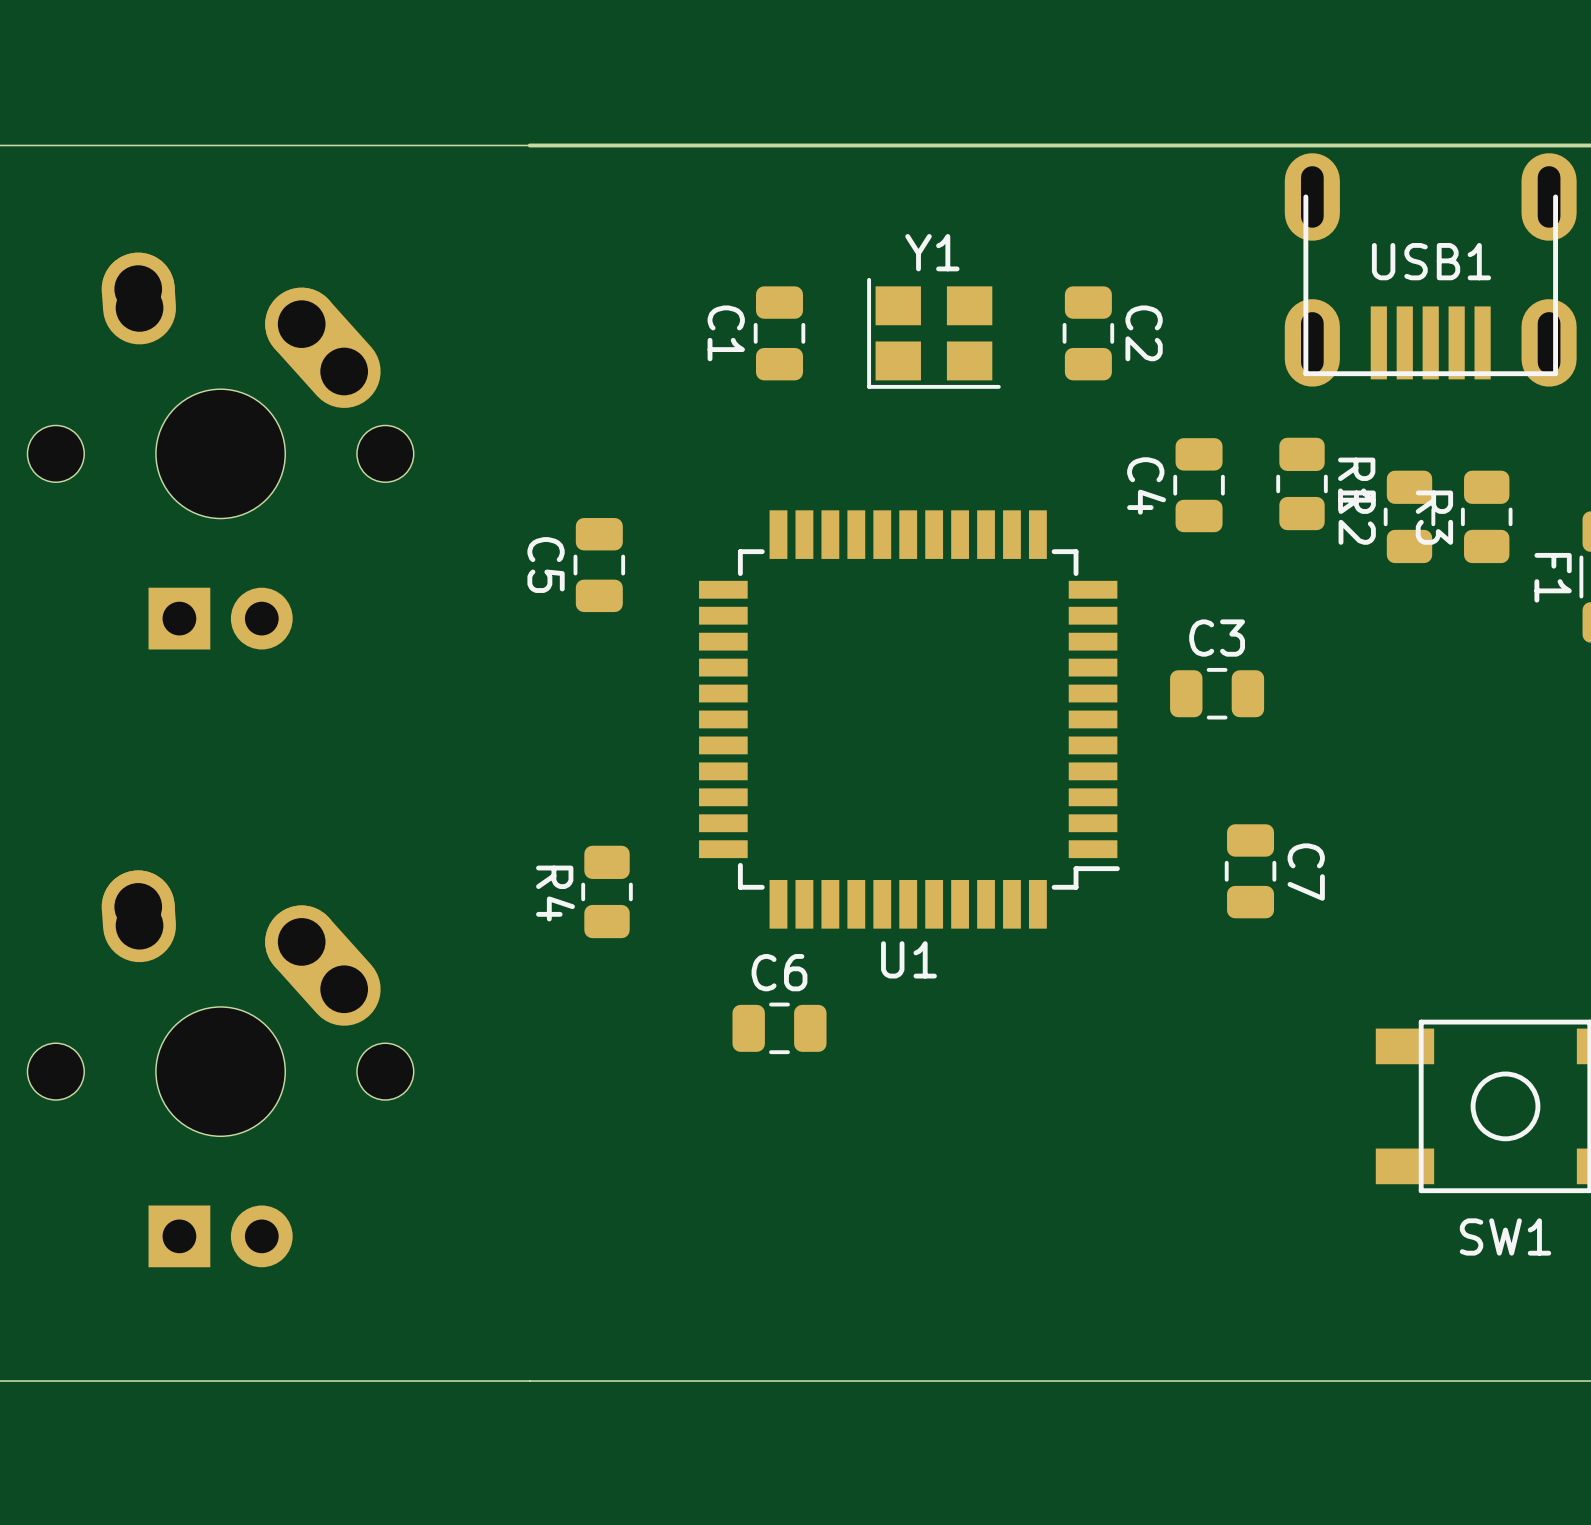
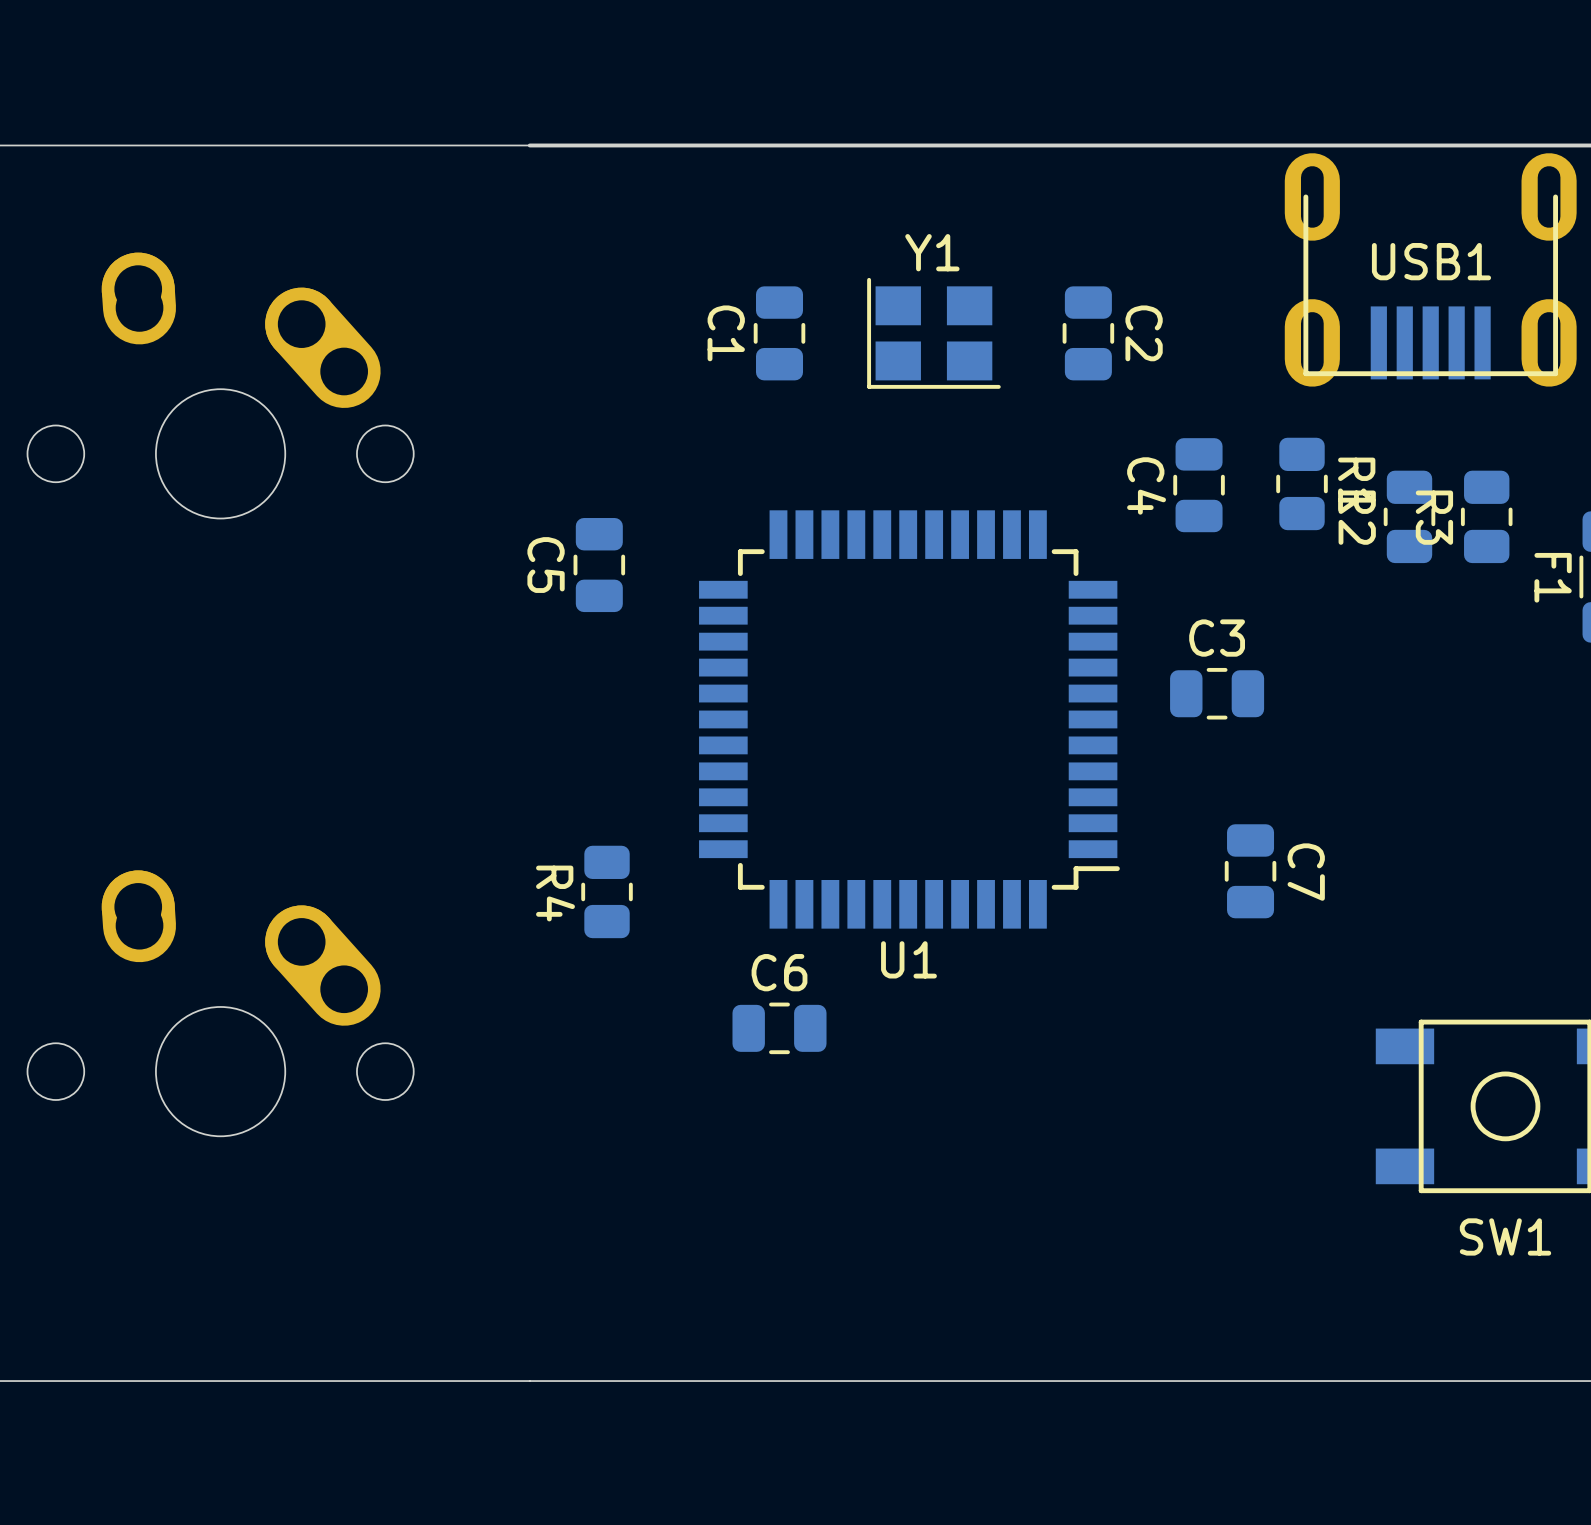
part: (220, 451) -> none
part: (220, 1068) -> none

